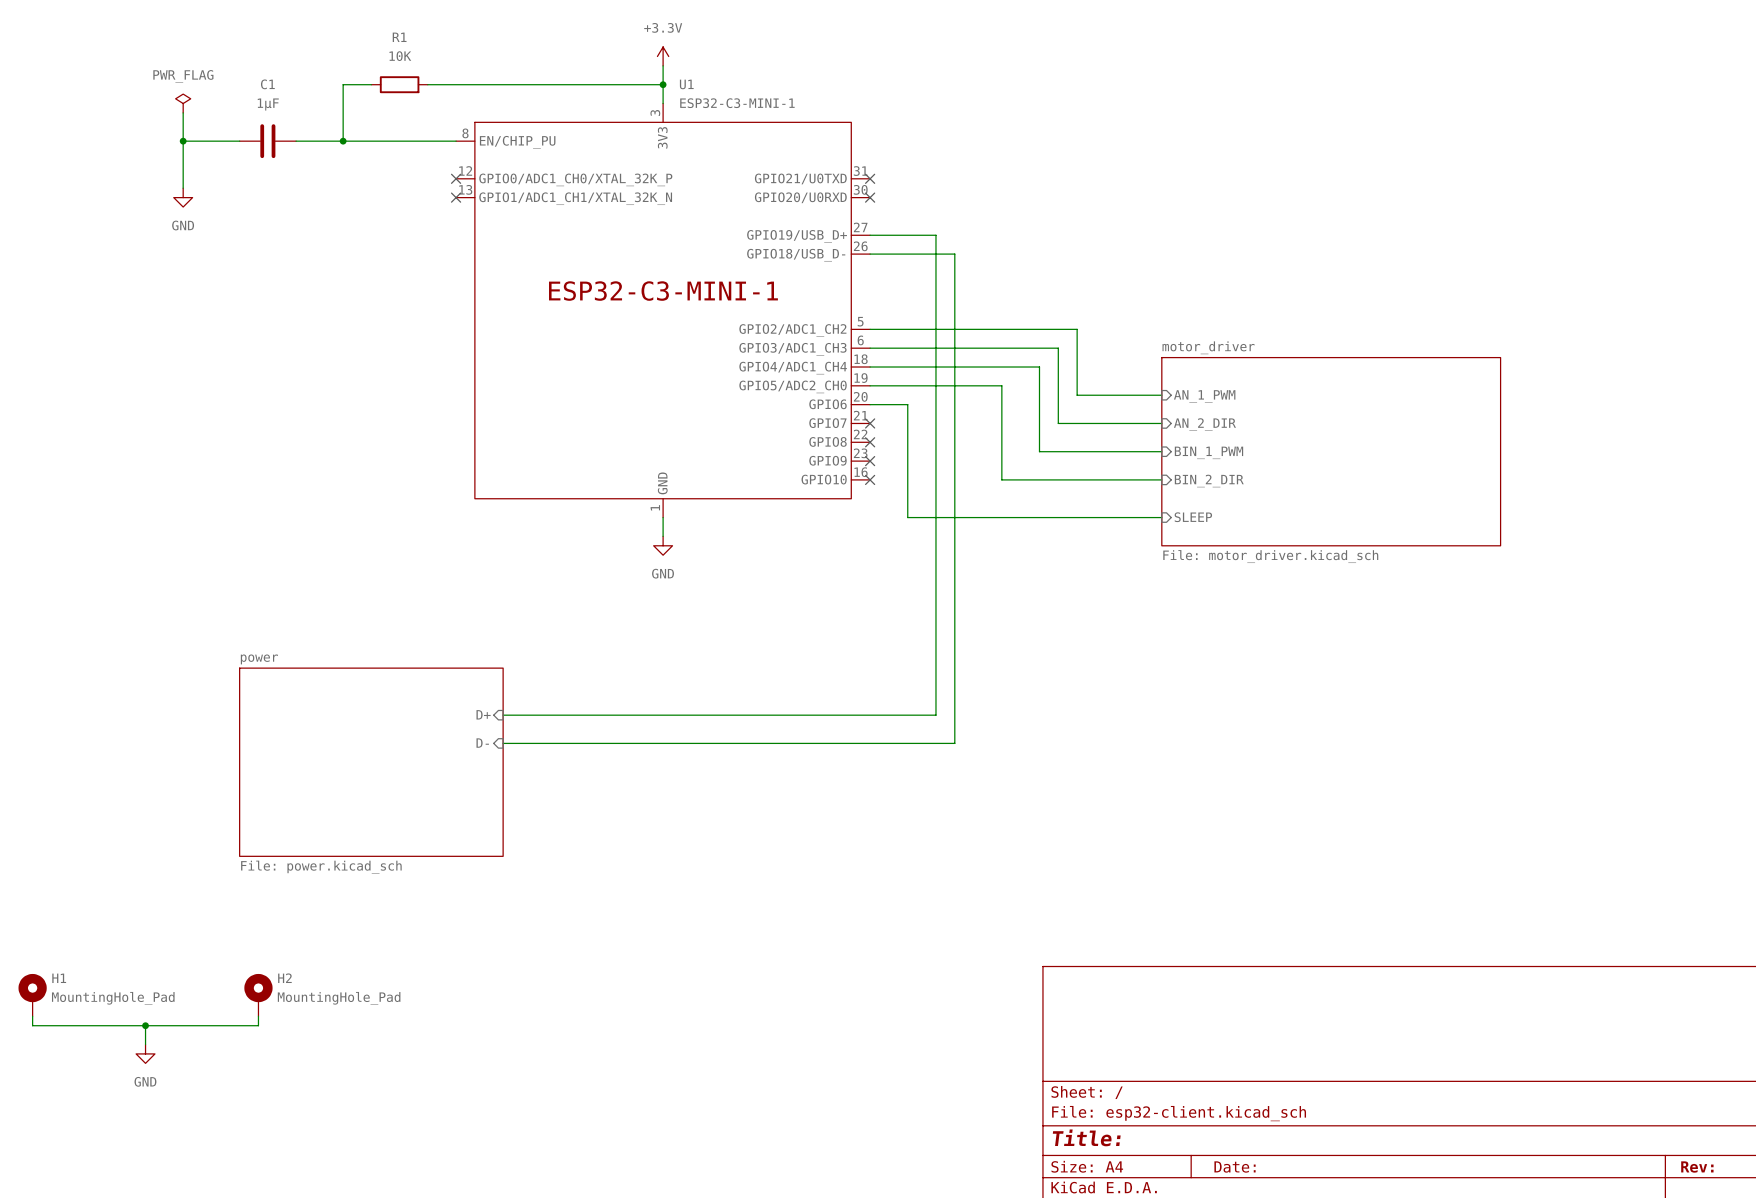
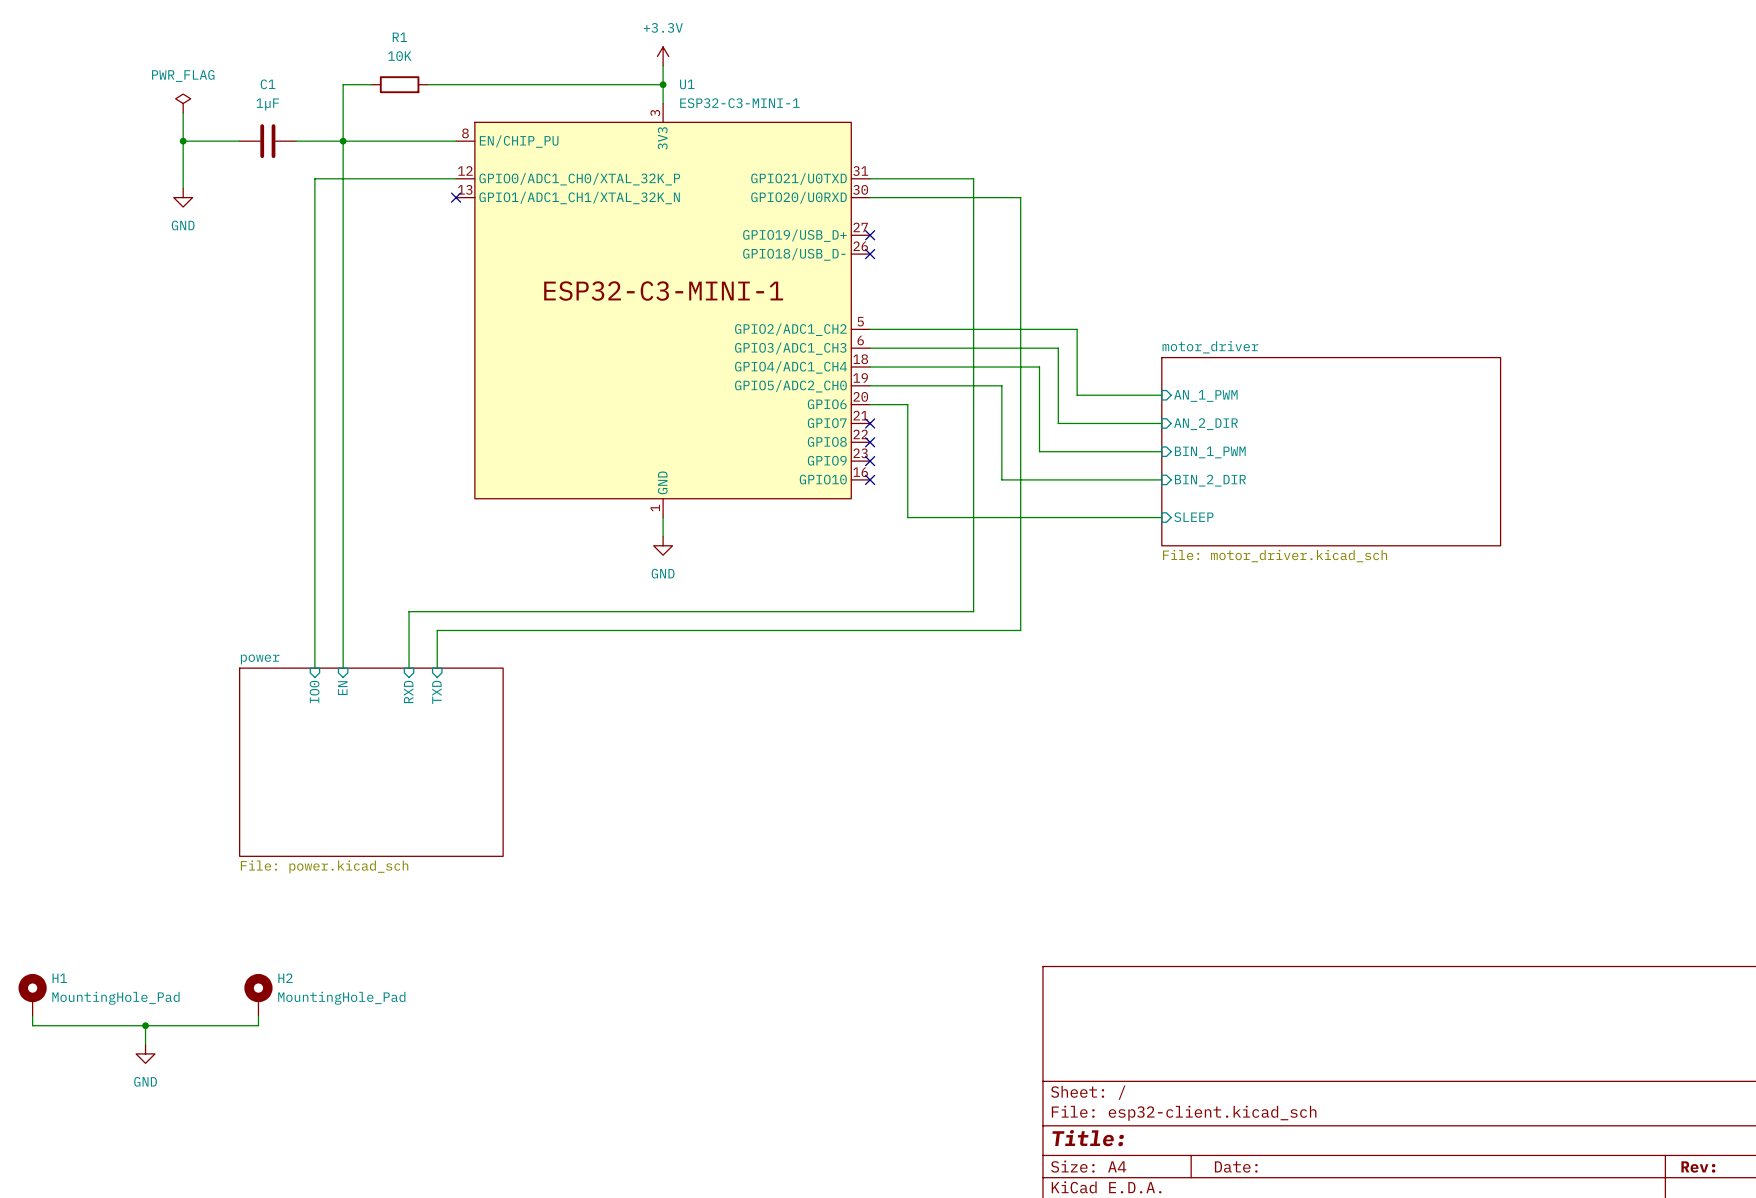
wire: none -> (343, 141) (343, 668)
wire: none -> (456, 178) (314, 178) (314, 668)
no-connect mark: (456, 178) -> none
wire: none -> (870, 178) (973, 178) (973, 611) (409, 611) (409, 668)
no-connect mark: (870, 178) -> none
wire: none -> (870, 197) (1020, 197) (1020, 630) (437, 630) (437, 668)
no-connect mark: (870, 197) -> none
wire: (870, 235) (935, 235) (935, 715) (503, 715) -> none
no-connect mark: none -> (870, 235)
wire: (870, 254) (954, 254) (954, 743) (503, 743) -> none
no-connect mark: none -> (870, 254)
sheet pin: none -> EN (342, 688)
sheet pin: none -> IO0 (314, 692)
sheet pin: none -> RXD (408, 691)
sheet pin: none -> TXD (436, 692)
sheet pin: D+ (483, 714) -> none
sheet pin: D- (482, 743) -> none

